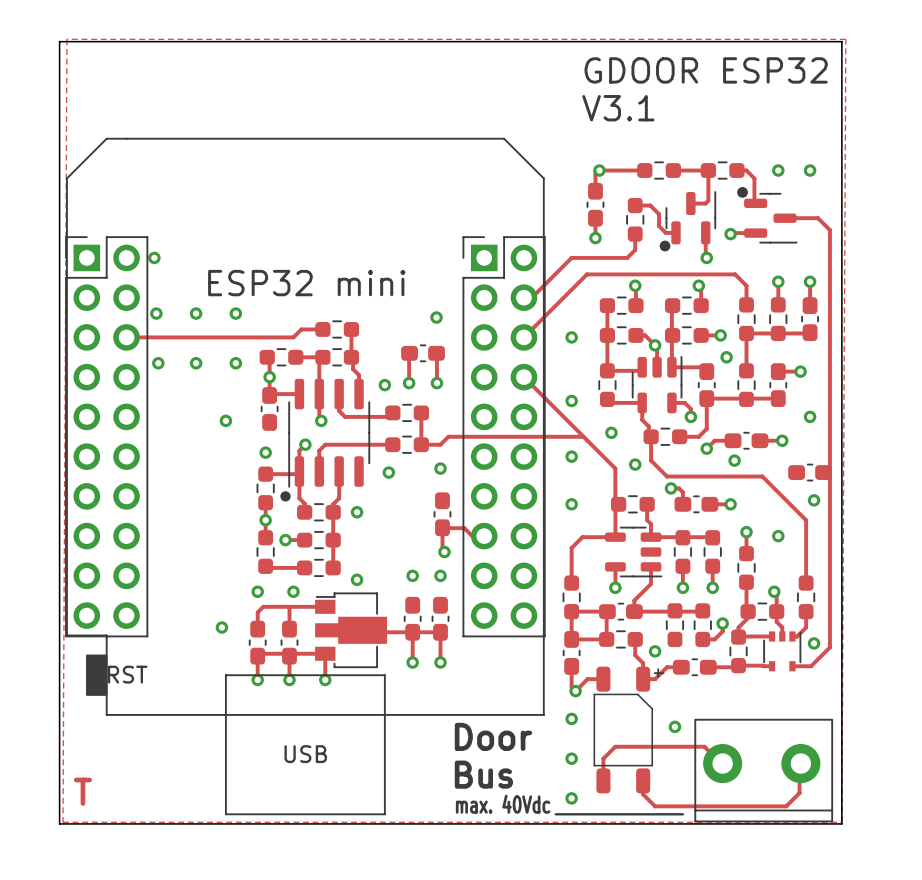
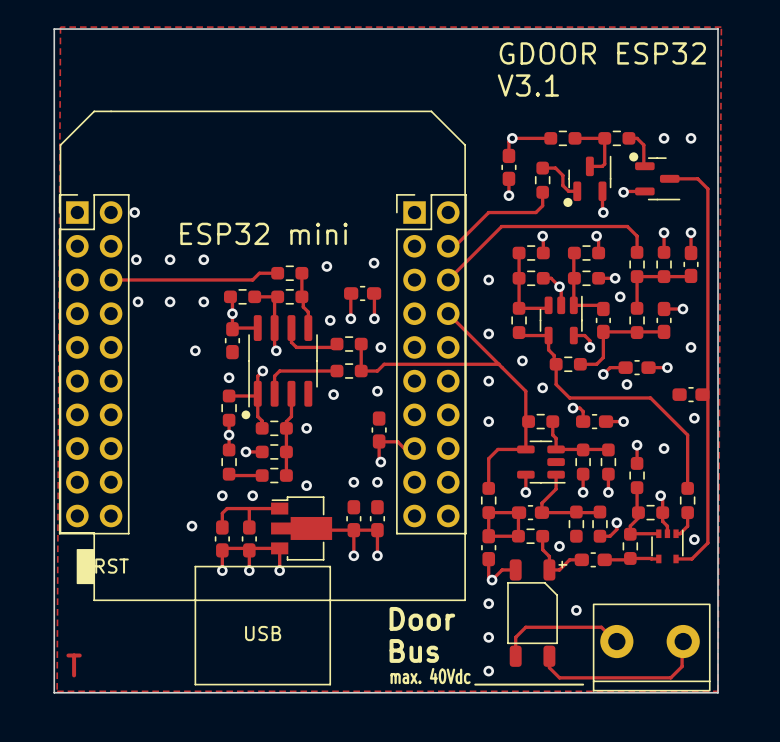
via: none -> (326, 266)
via: none -> (380, 347)

